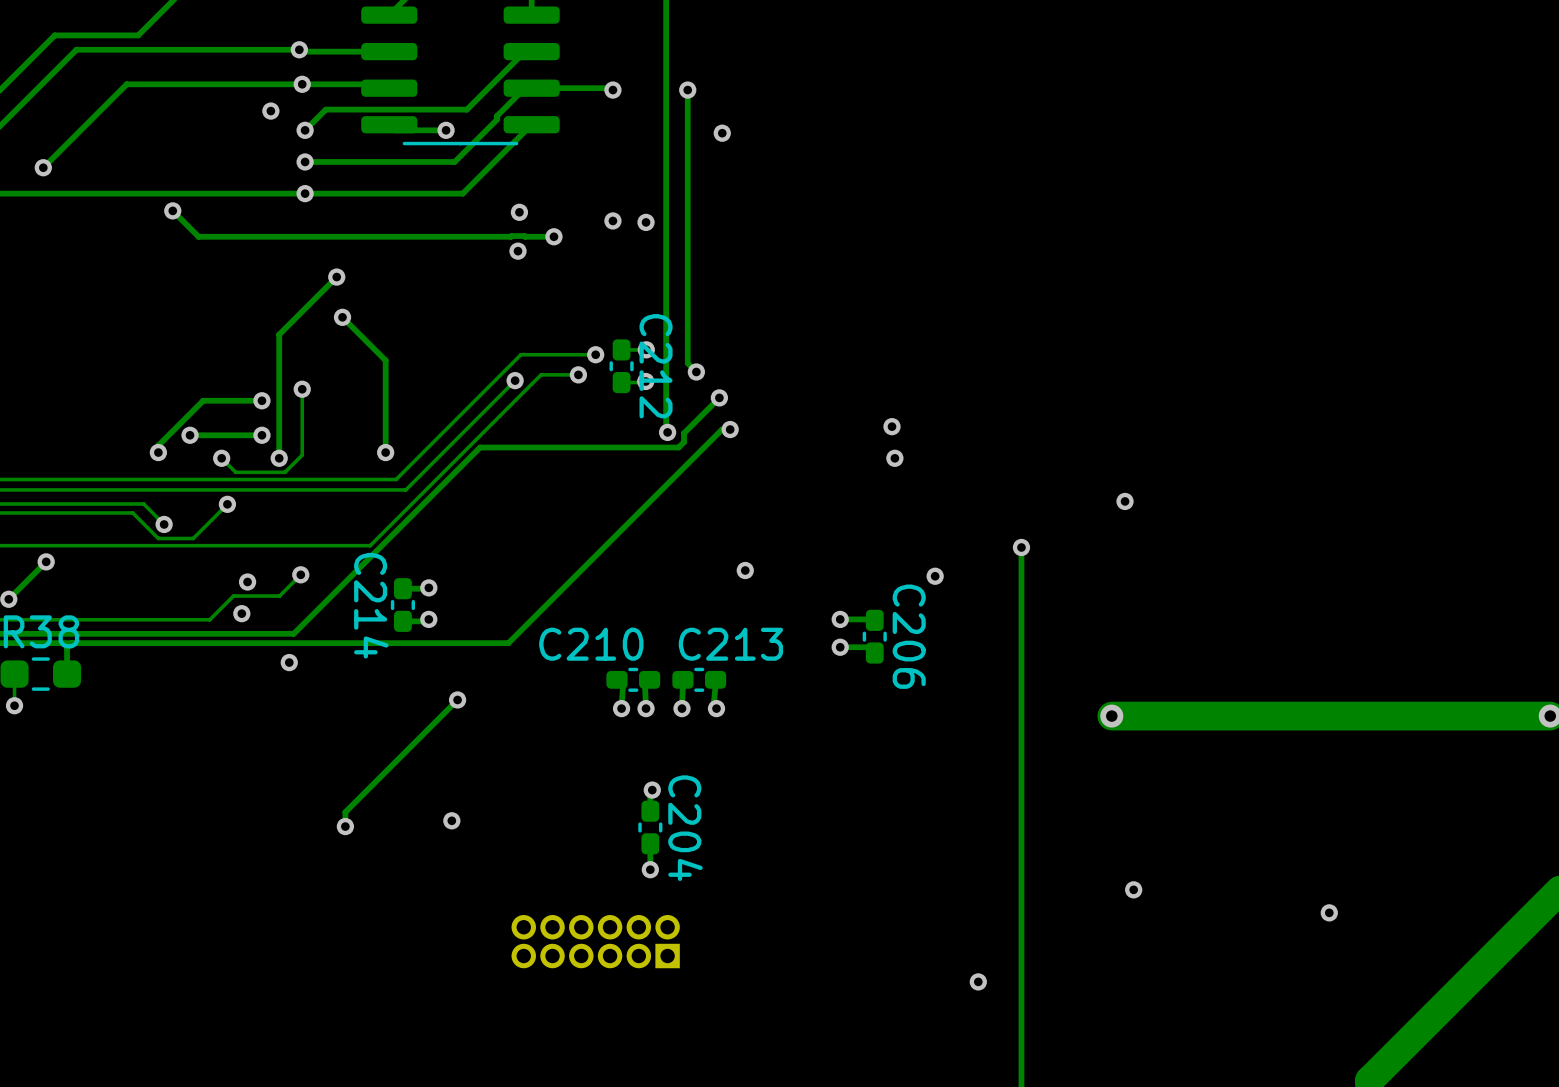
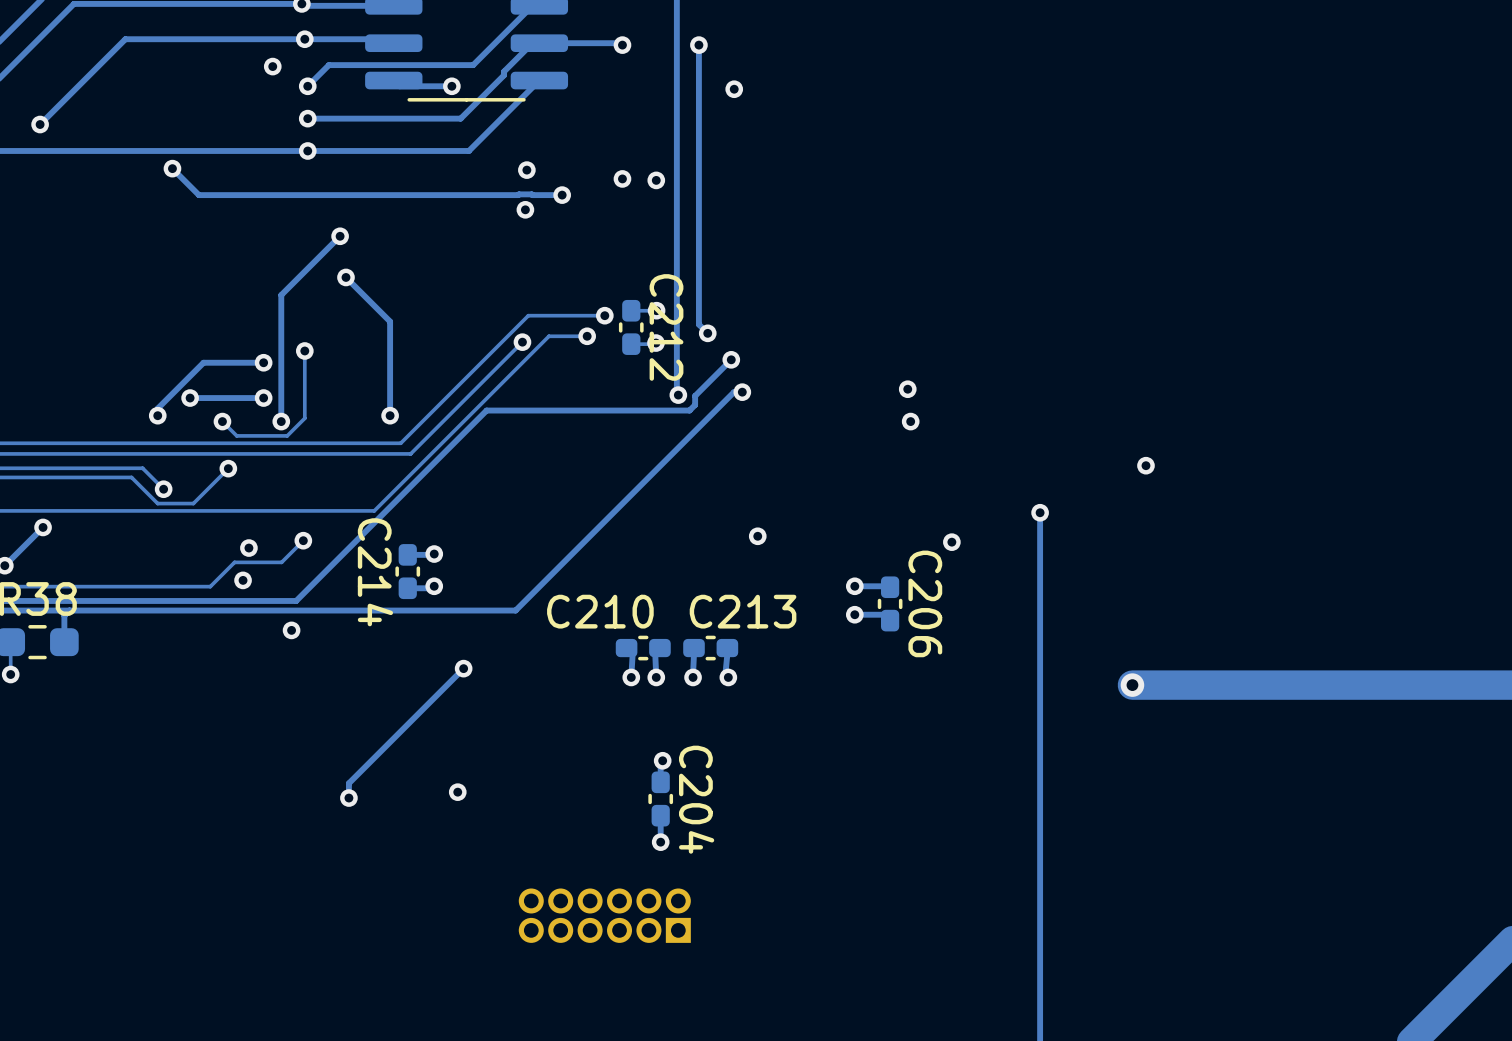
via: (1133, 889) -> none
via: (1329, 912) -> none
via: (978, 981) -> none

